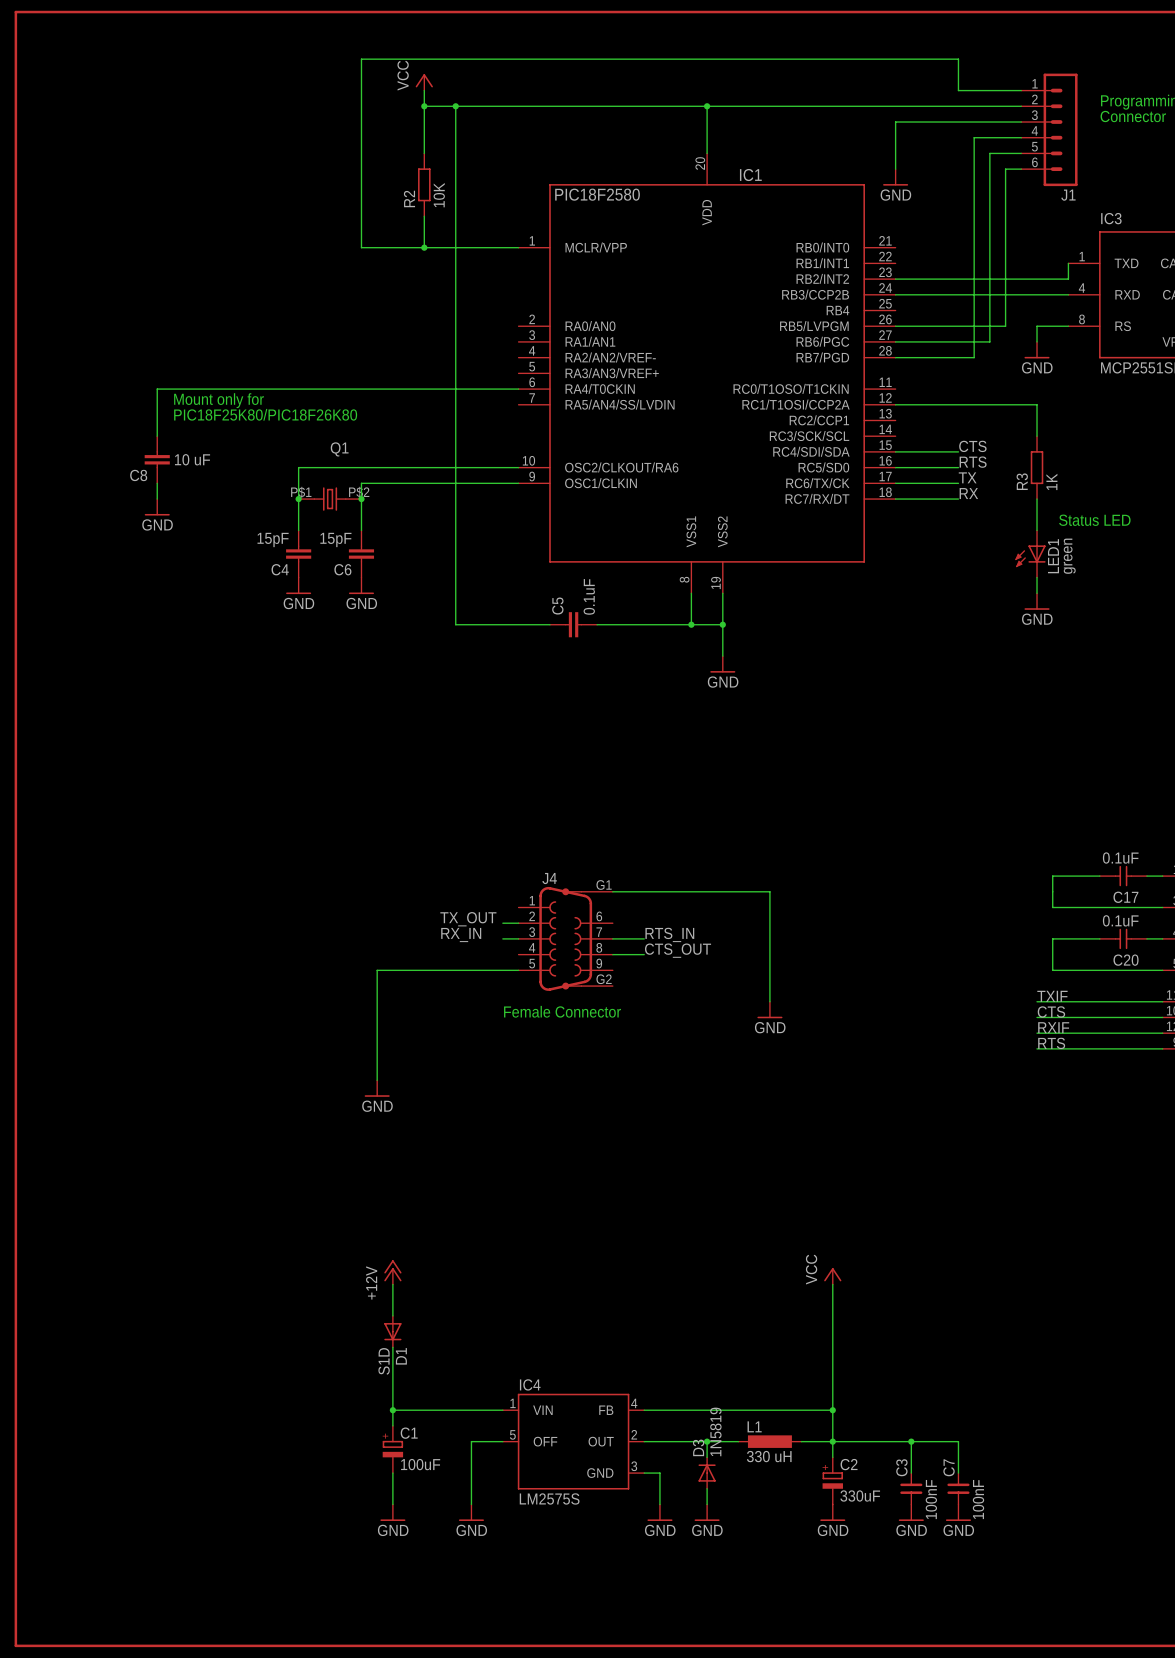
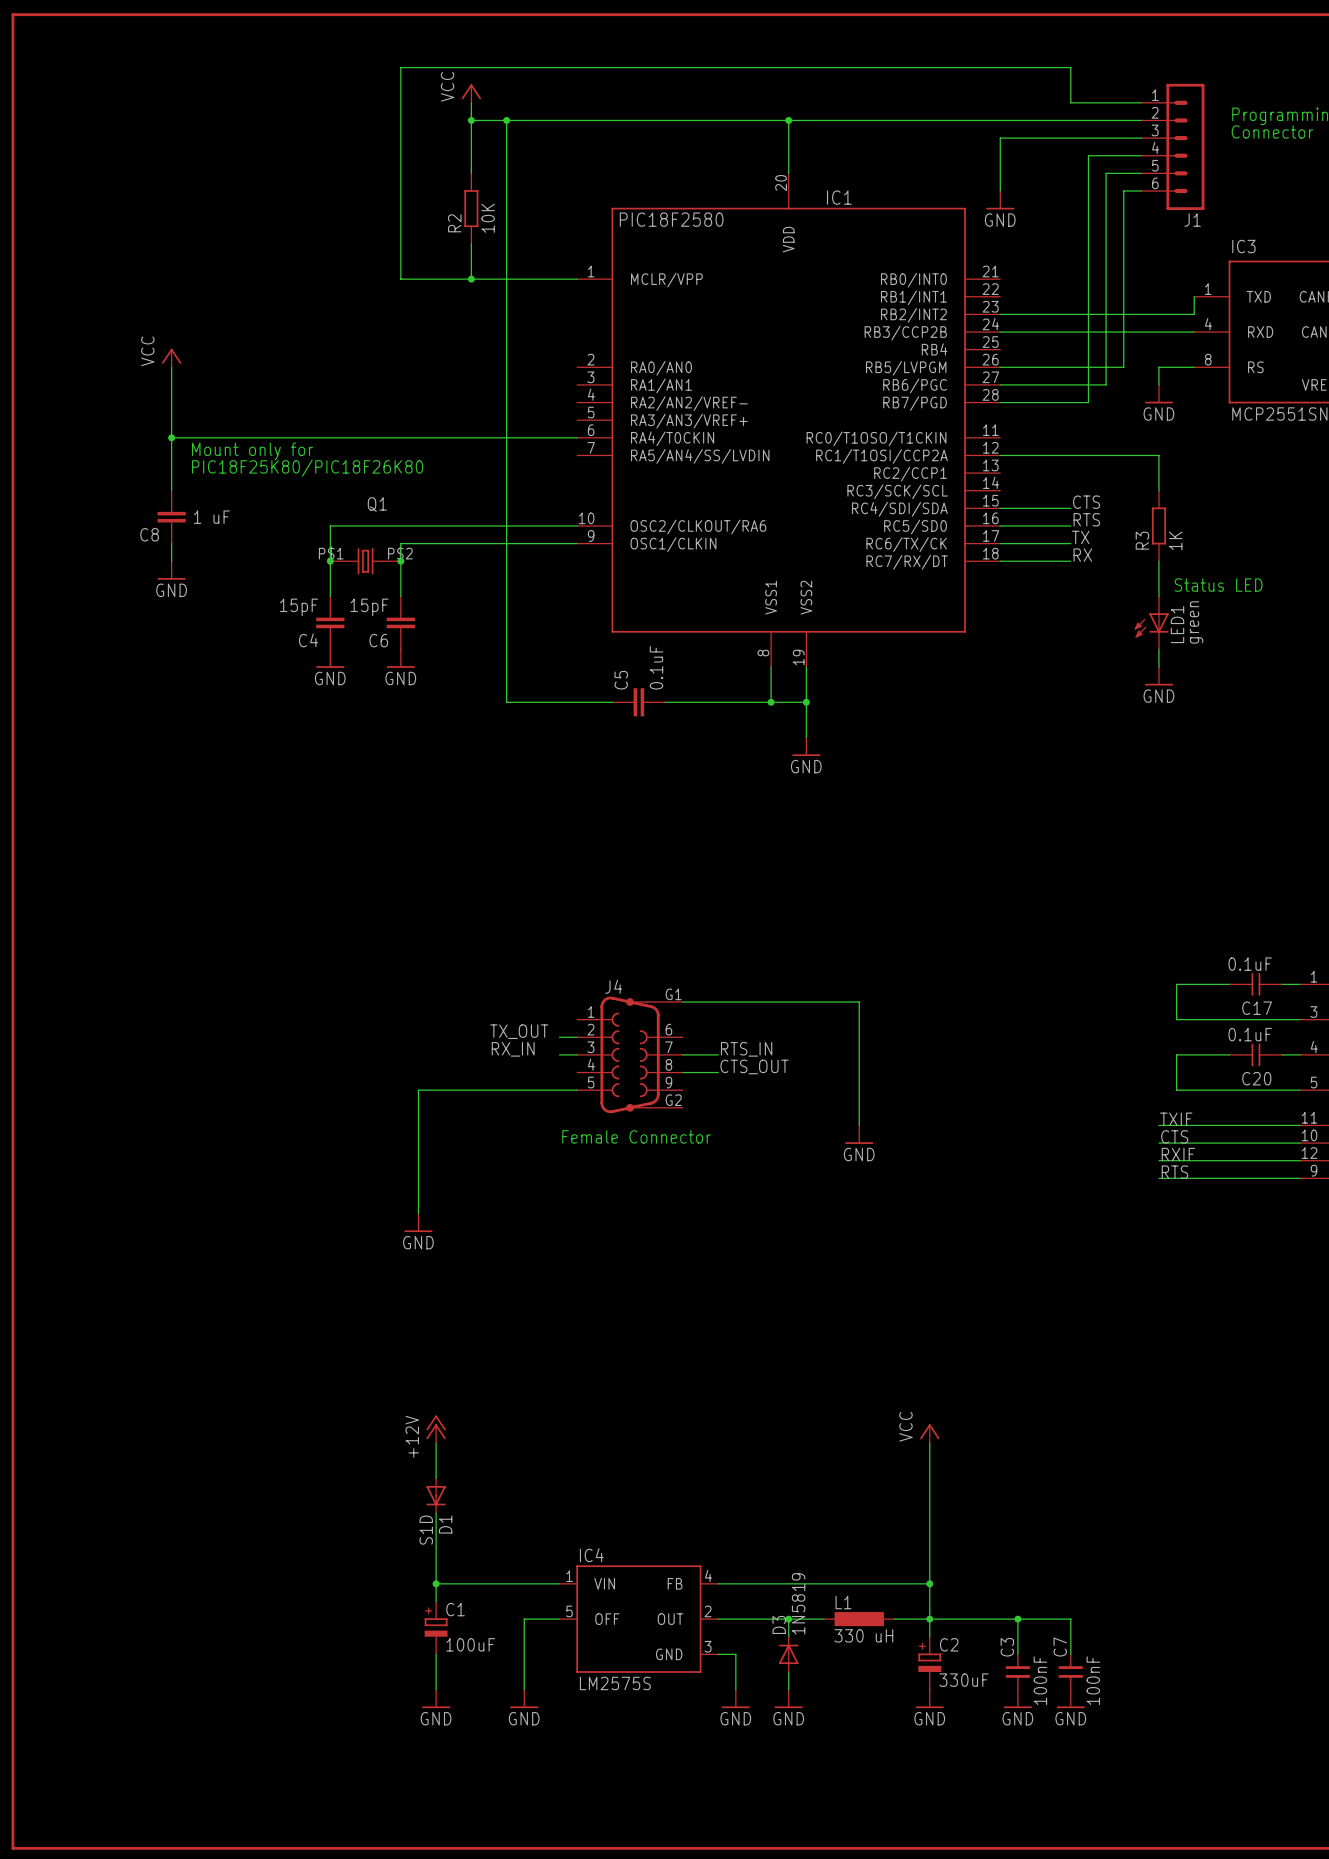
power symbol: none -> VCC (171, 358)
wire: none -> (171, 367) (171, 437)
junction: none -> (171, 437)
C8 value: 10 uF (192, 459) -> 1 uF (211, 517)

